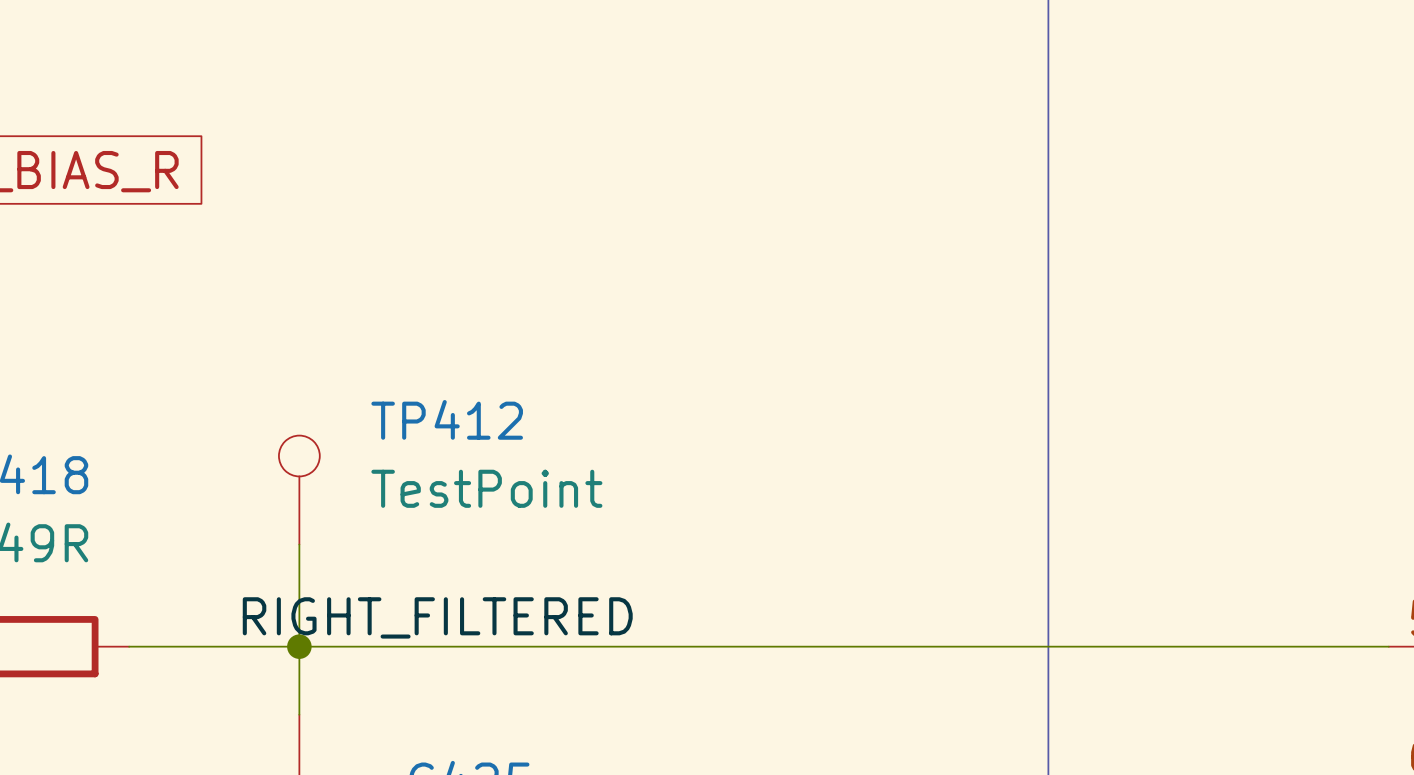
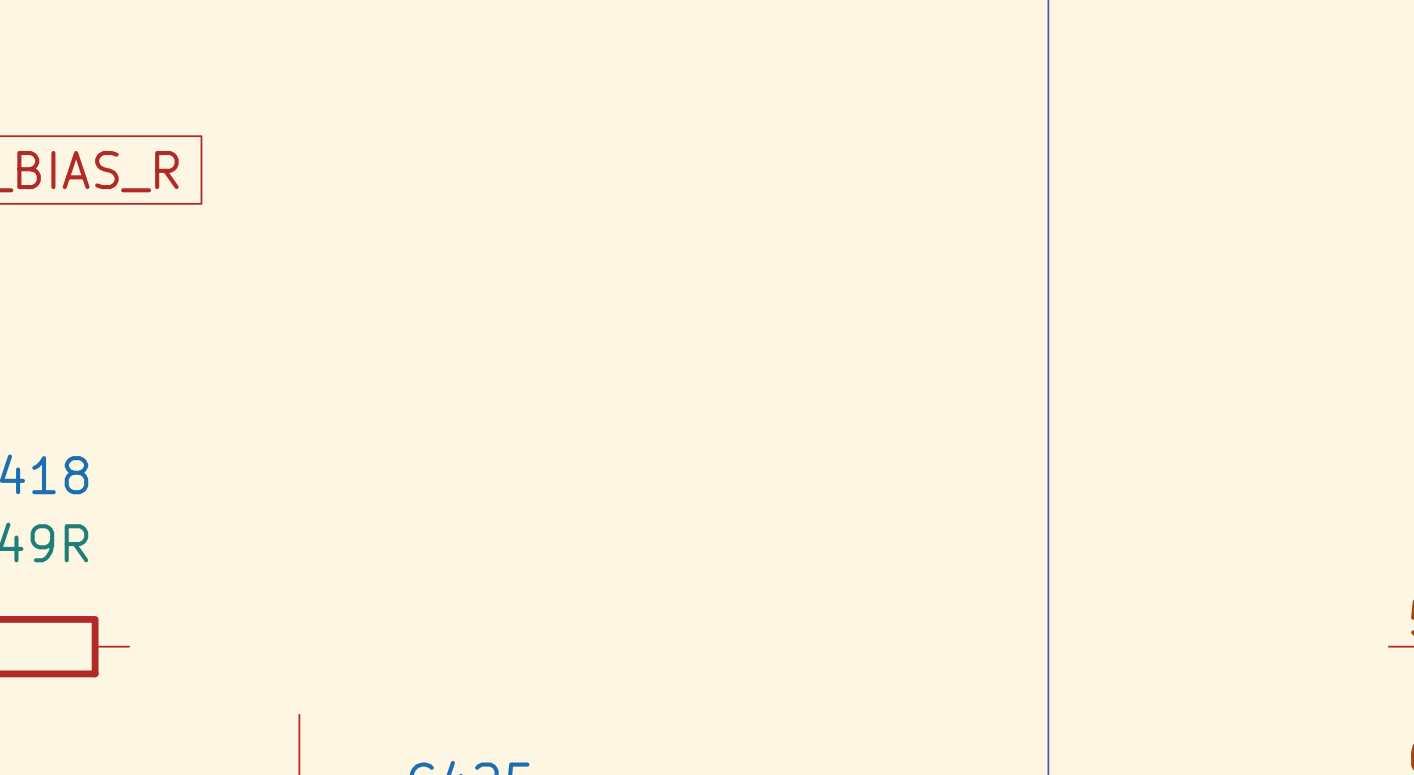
TP412: TestPoint (299, 490) -> none
wire: (299, 544) (299, 714) -> none
label: RIGHT_FILTERED (437, 617) -> none
wire: (129, 646) (1388, 646) -> none
junction: (299, 646) -> none

